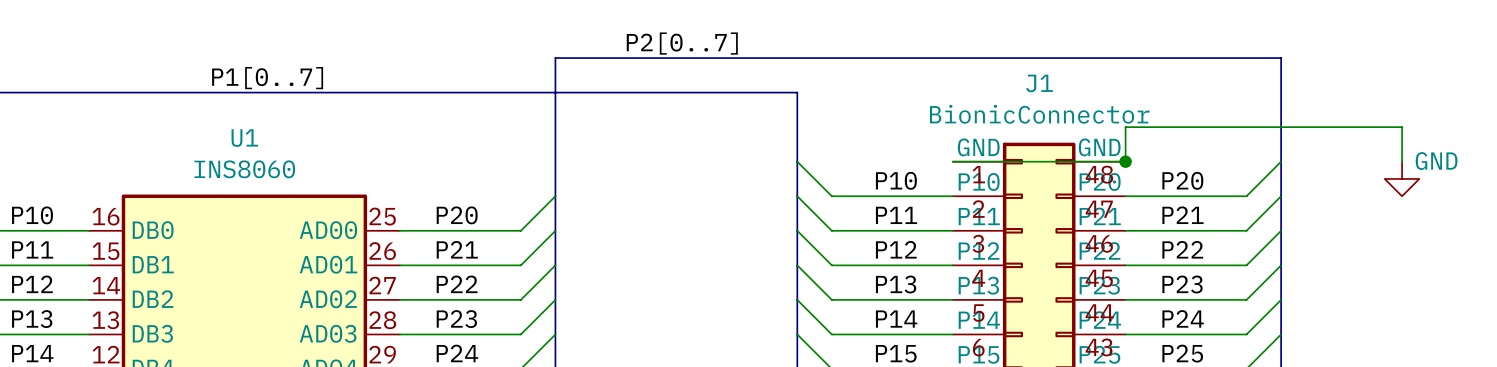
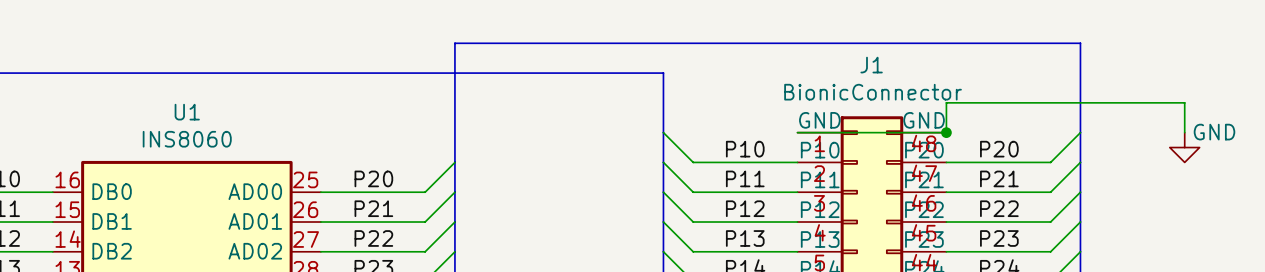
label: P2[0..7] (682, 43) -> none
label: P1[0..7] (267, 78) -> none

